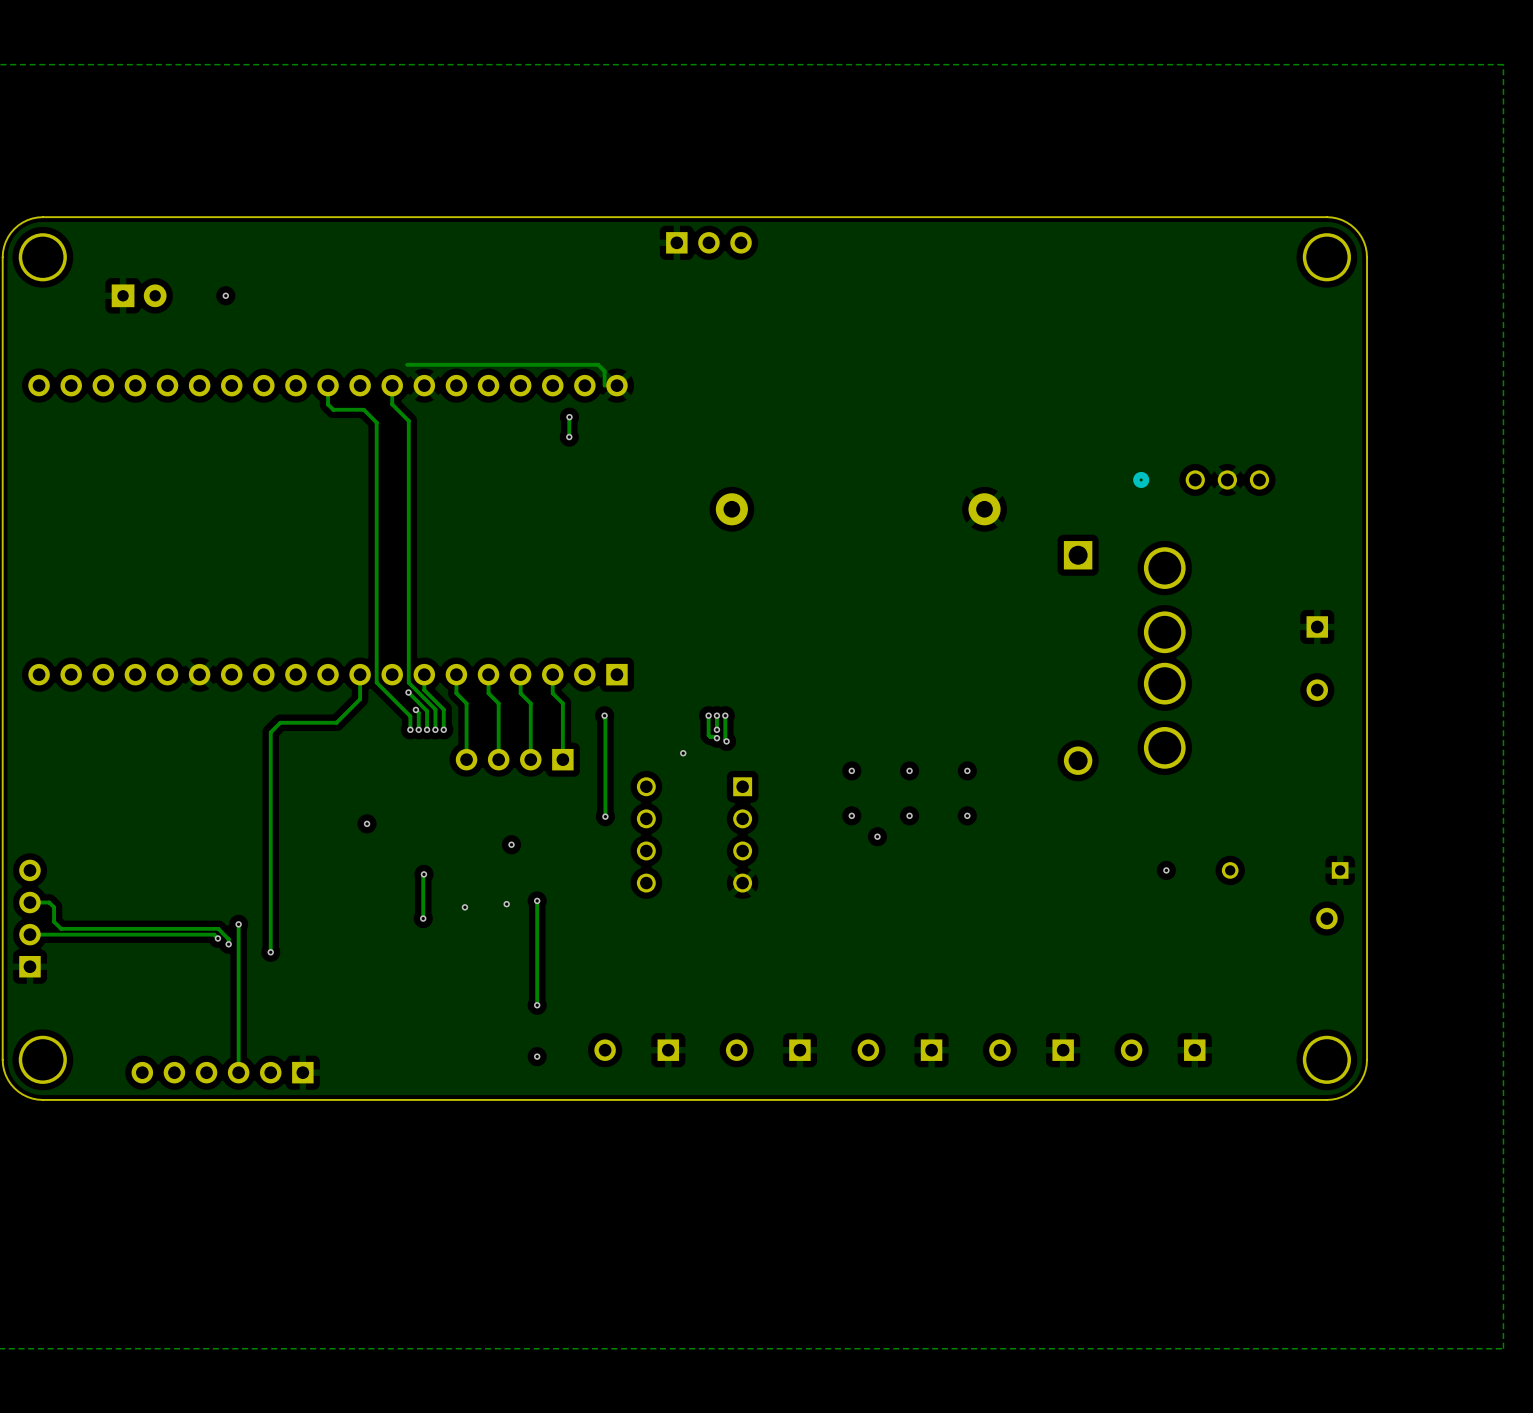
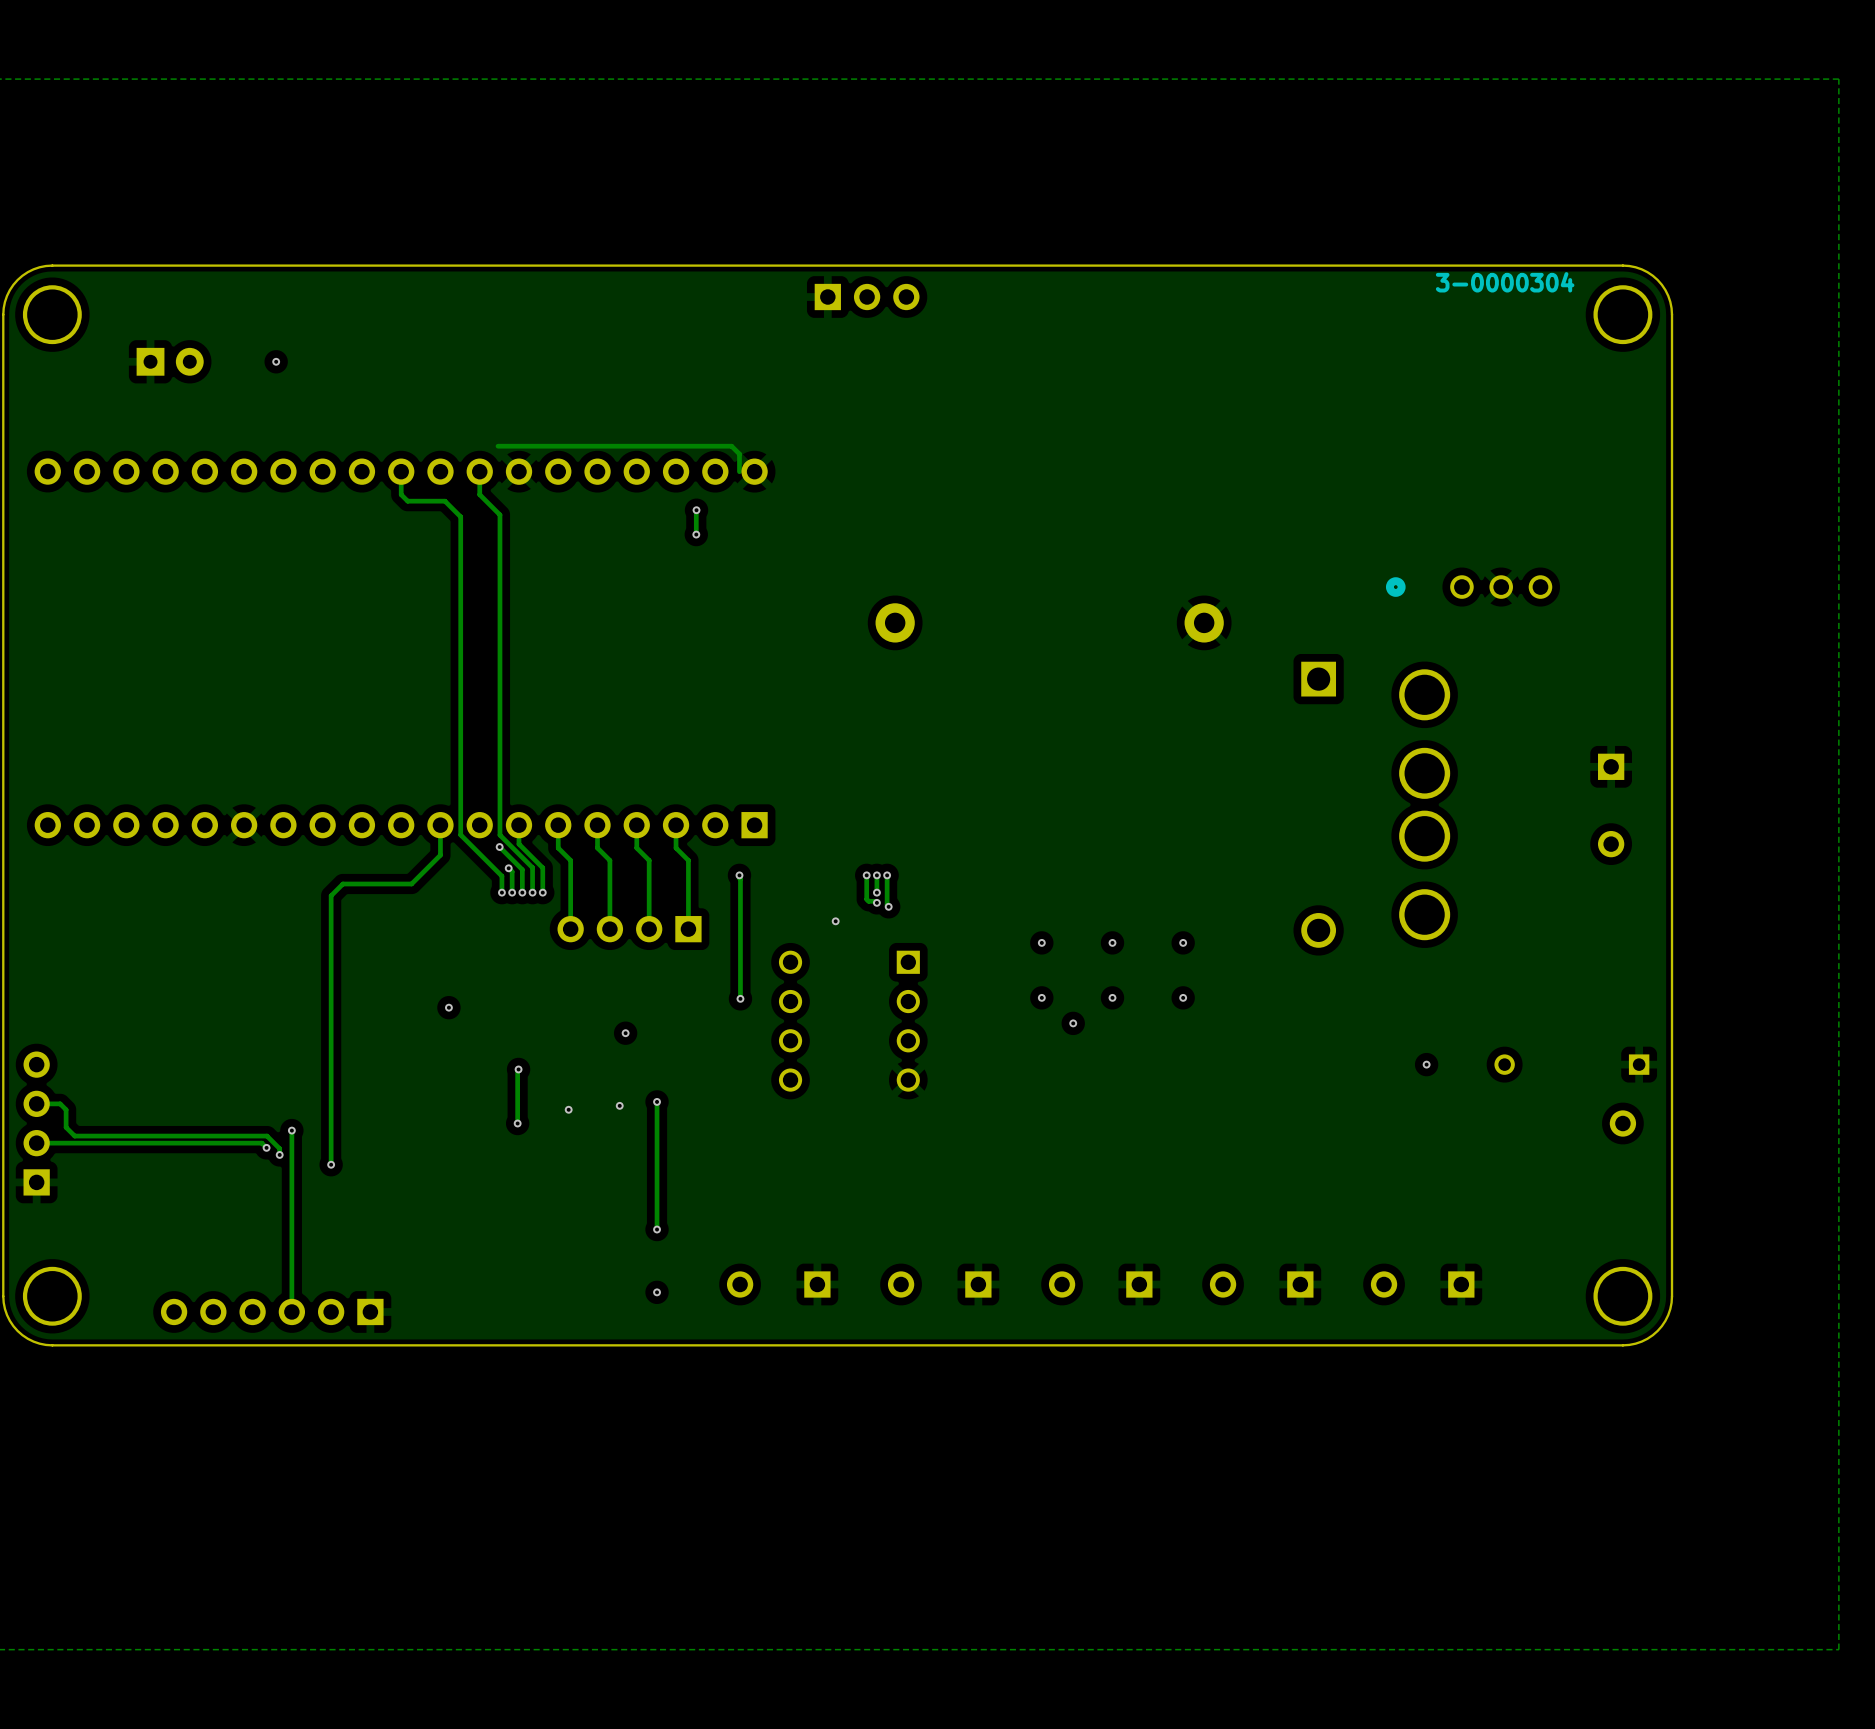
text: none -> 3-0000304 (1505, 282)

